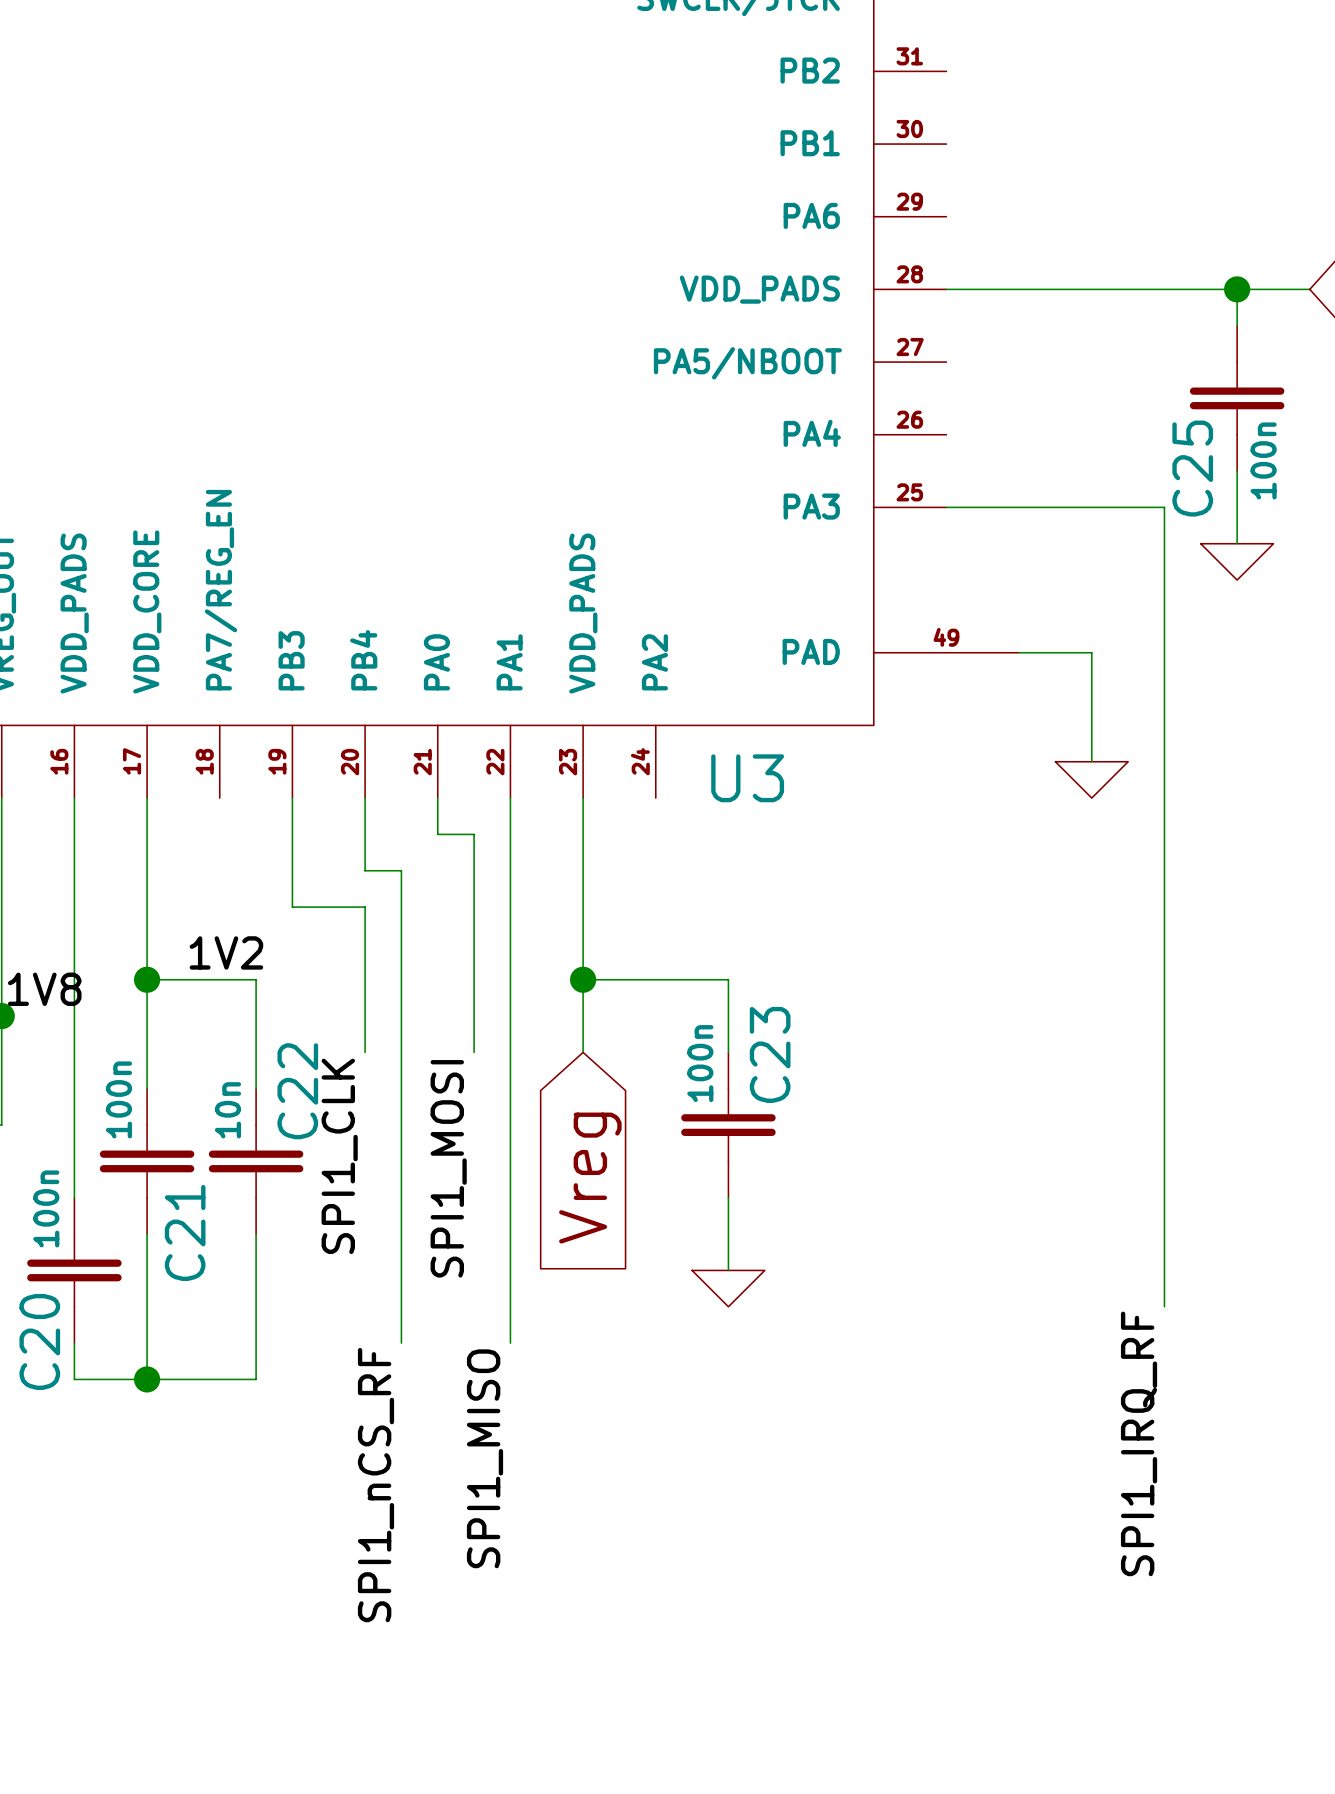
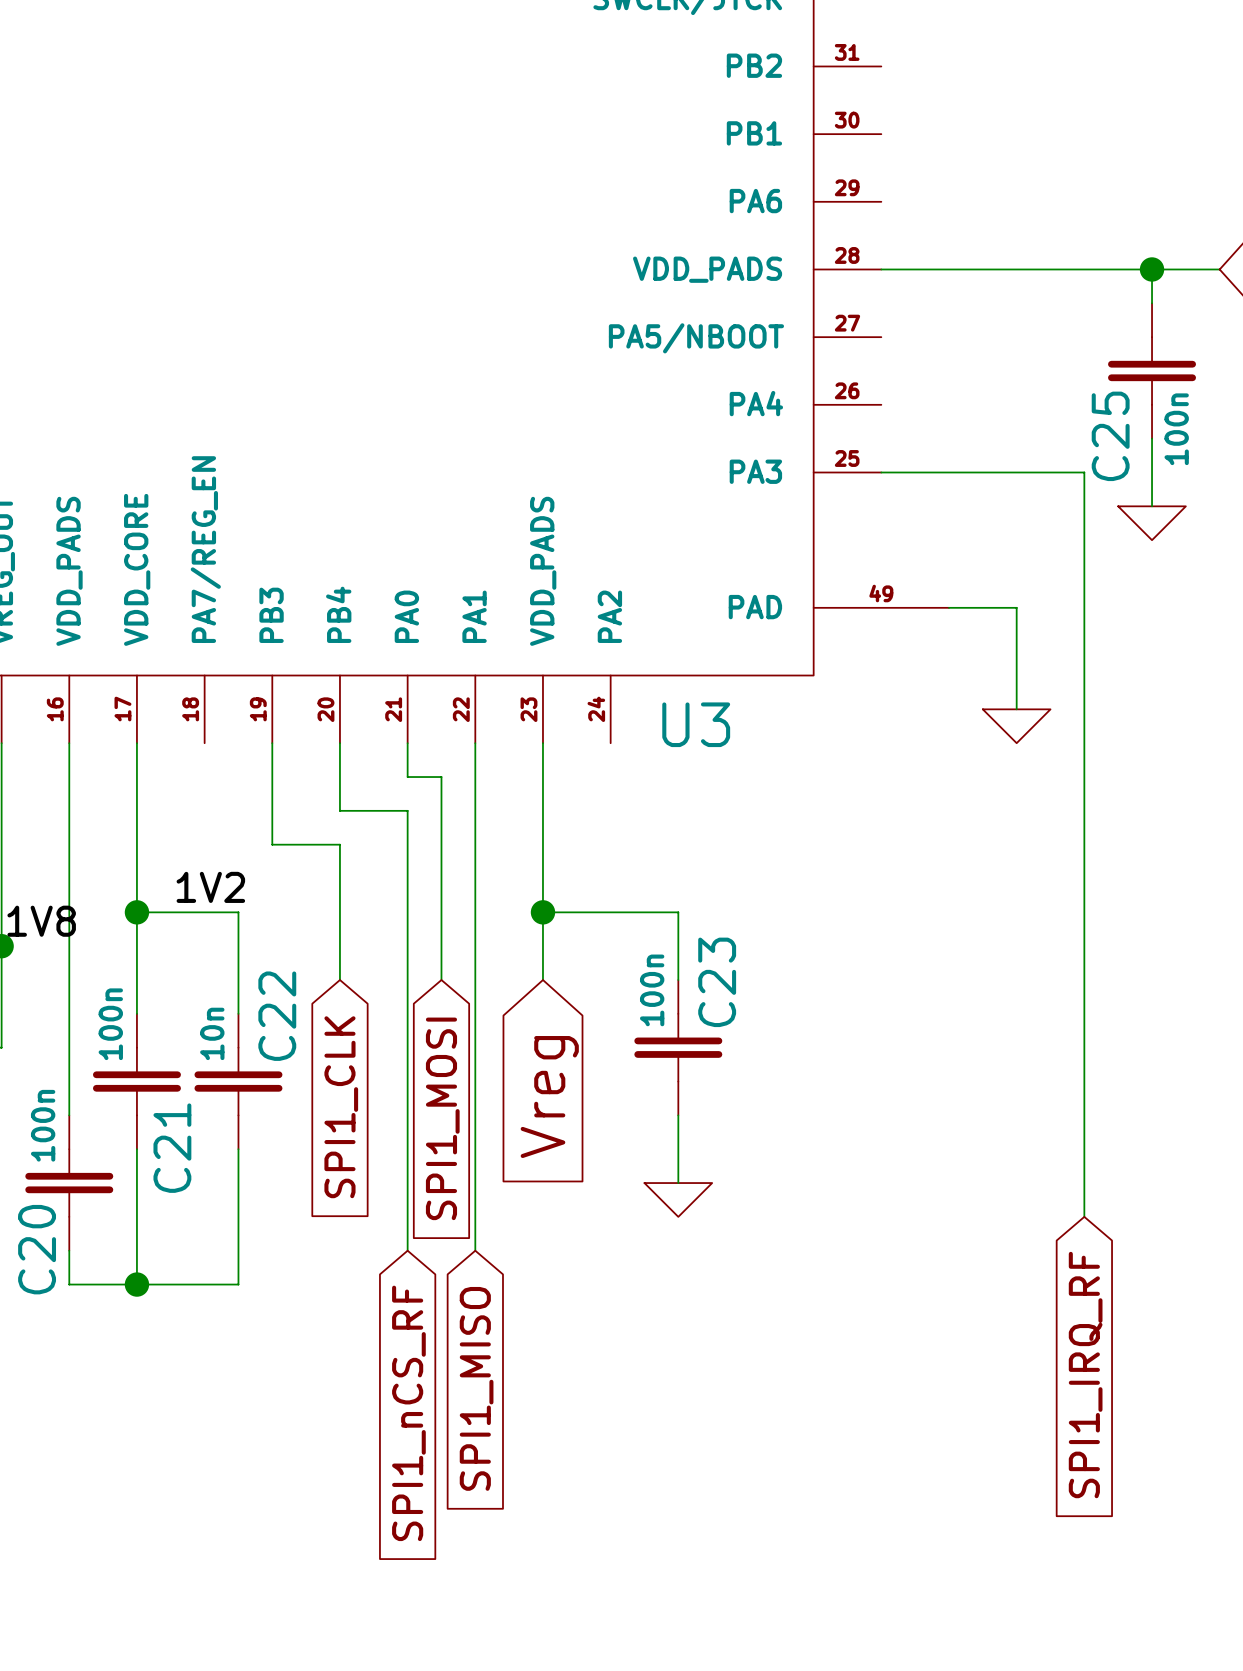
wire: (401, 870) (401, 1343) -> (373, 810) (407, 810) (407, 1250)
label: SPI1_CLK (339, 1156) -> none
label: SPI1_MOSI (448, 1168) -> none
global label: none -> SPI1_CLK (341, 1107)
global label: none -> SPI1_MOSI (442, 1118)
label: SPI1_IRQ_RF (1139, 1443) -> none
label: SPI1_MISO (485, 1458) -> none
global label: none -> SPI1_IRQ_RF (1085, 1375)
label: SPI1_nCS_RF (375, 1485) -> none
global label: none -> SPI1_MISO (476, 1388)
global label: none -> SPI1_nCS_RF (408, 1413)

